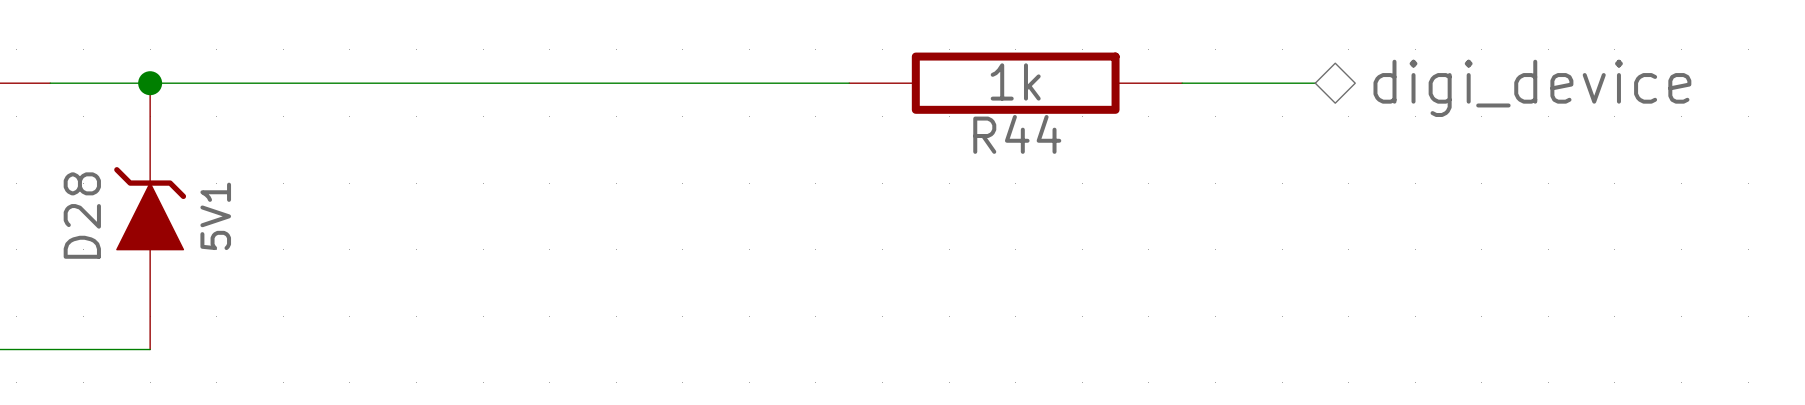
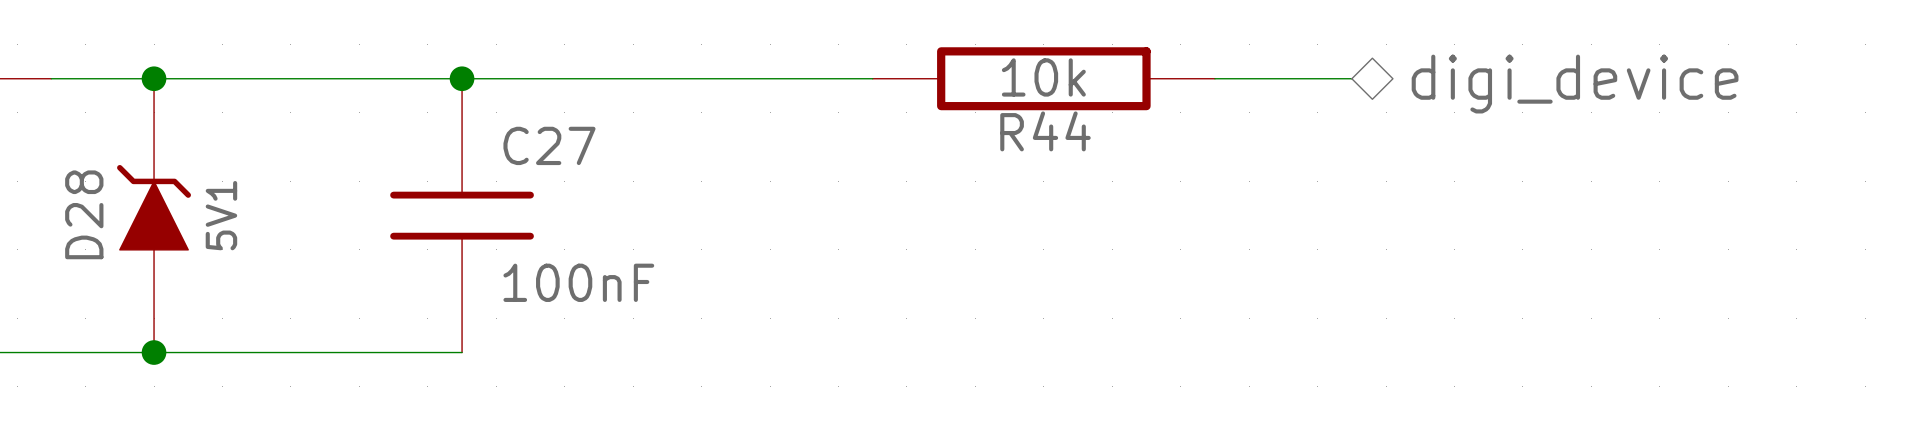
R44 value: 1k (1015, 81) -> 10k (1043, 77)
junction: none -> (462, 78)
C27: none -> 100nF (462, 215)
wire: none -> (154, 352) (462, 352)
junction: none -> (154, 352)

